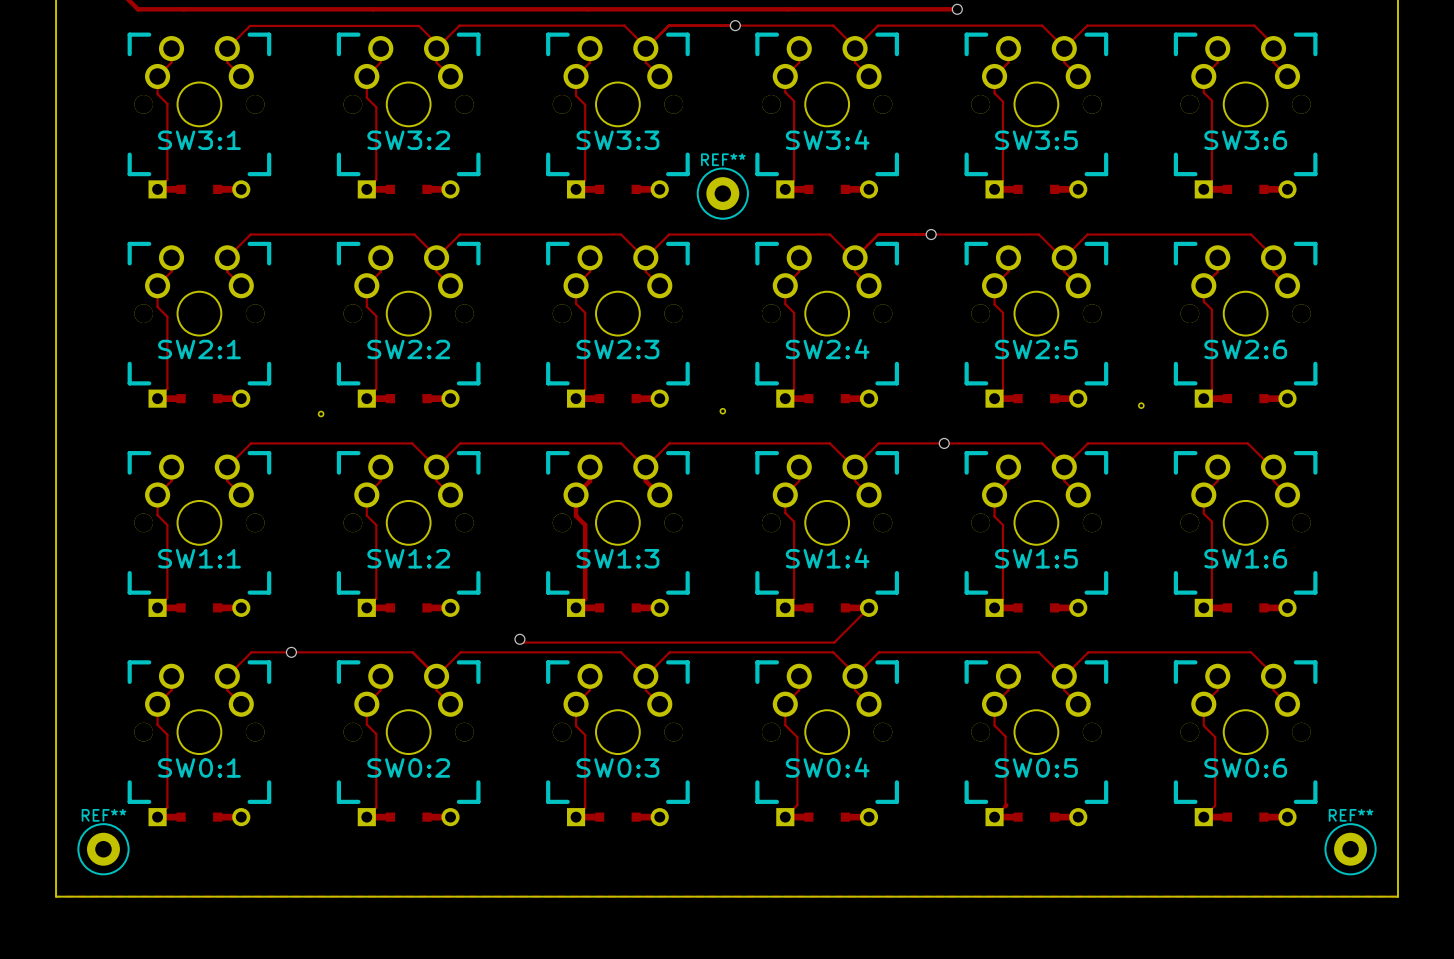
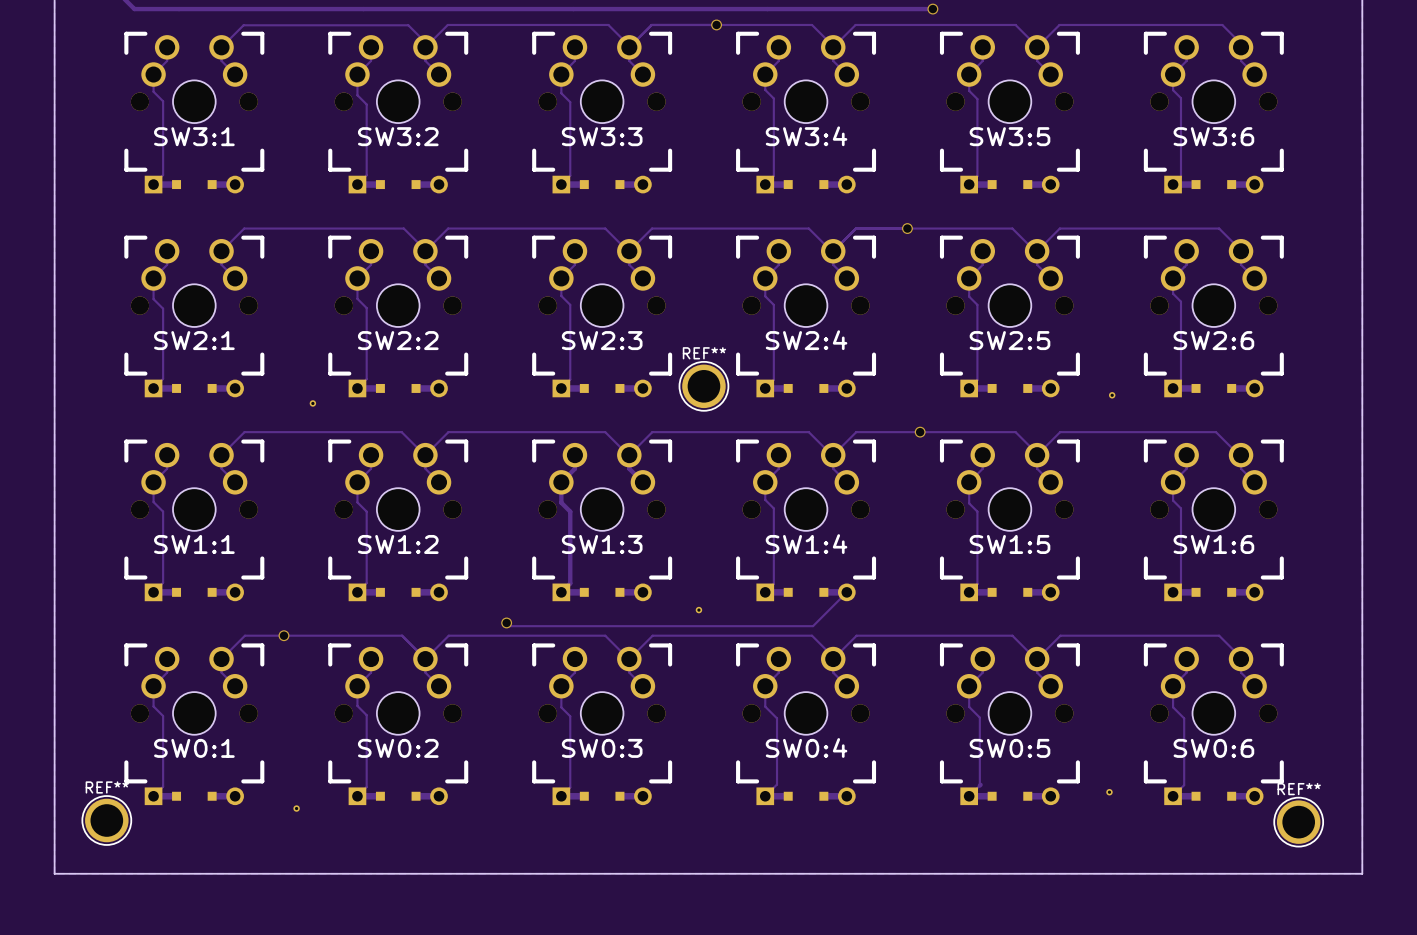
REF**: (722, 193) -> none
REF**: none -> (703, 386)
part position: (722, 411) -> (698, 610)
part: none -> (1109, 792)
REF** footprint: [77, 823, 130, 876] -> [81, 795, 133, 846]
part: none -> (296, 808)
REF**: none -> (1298, 822)
REF**: (1350, 849) -> none

